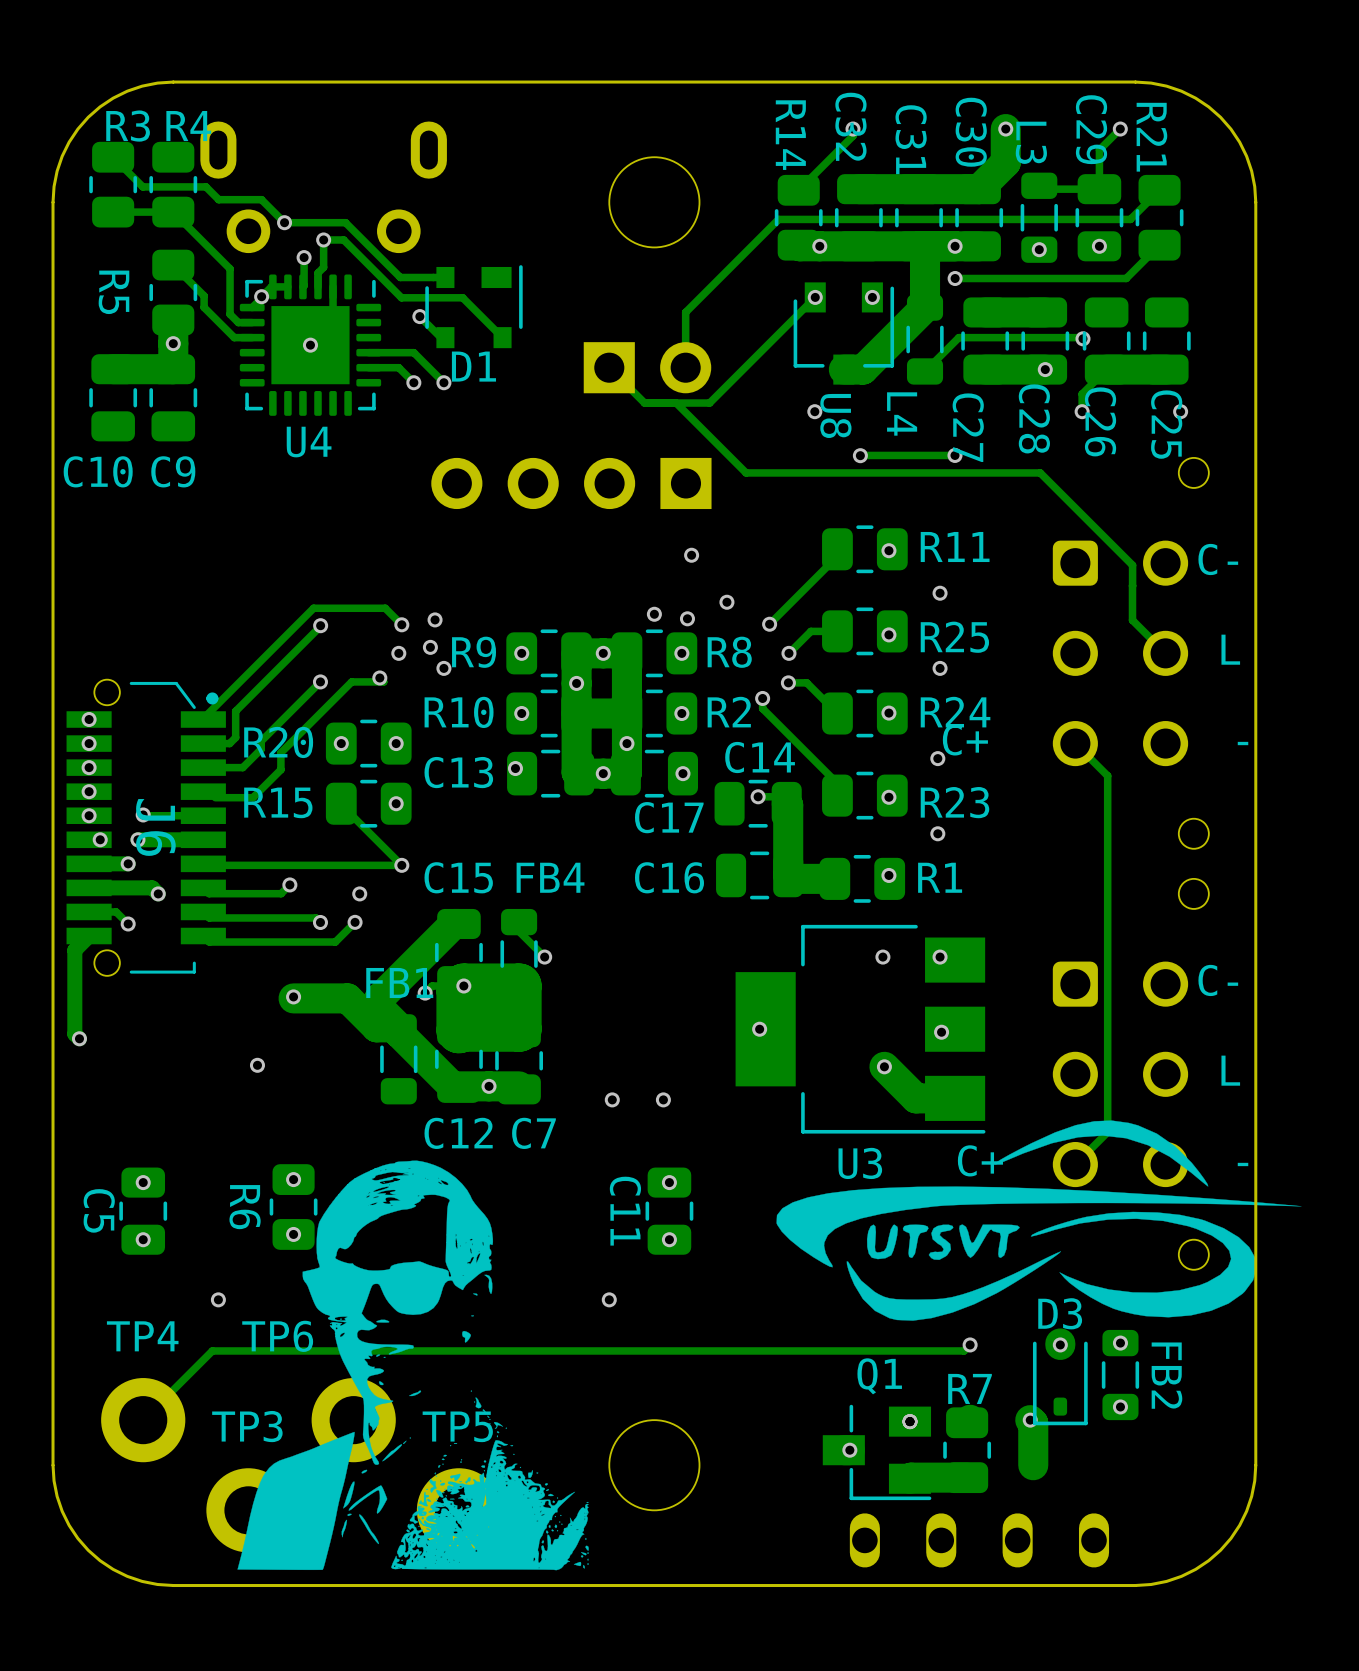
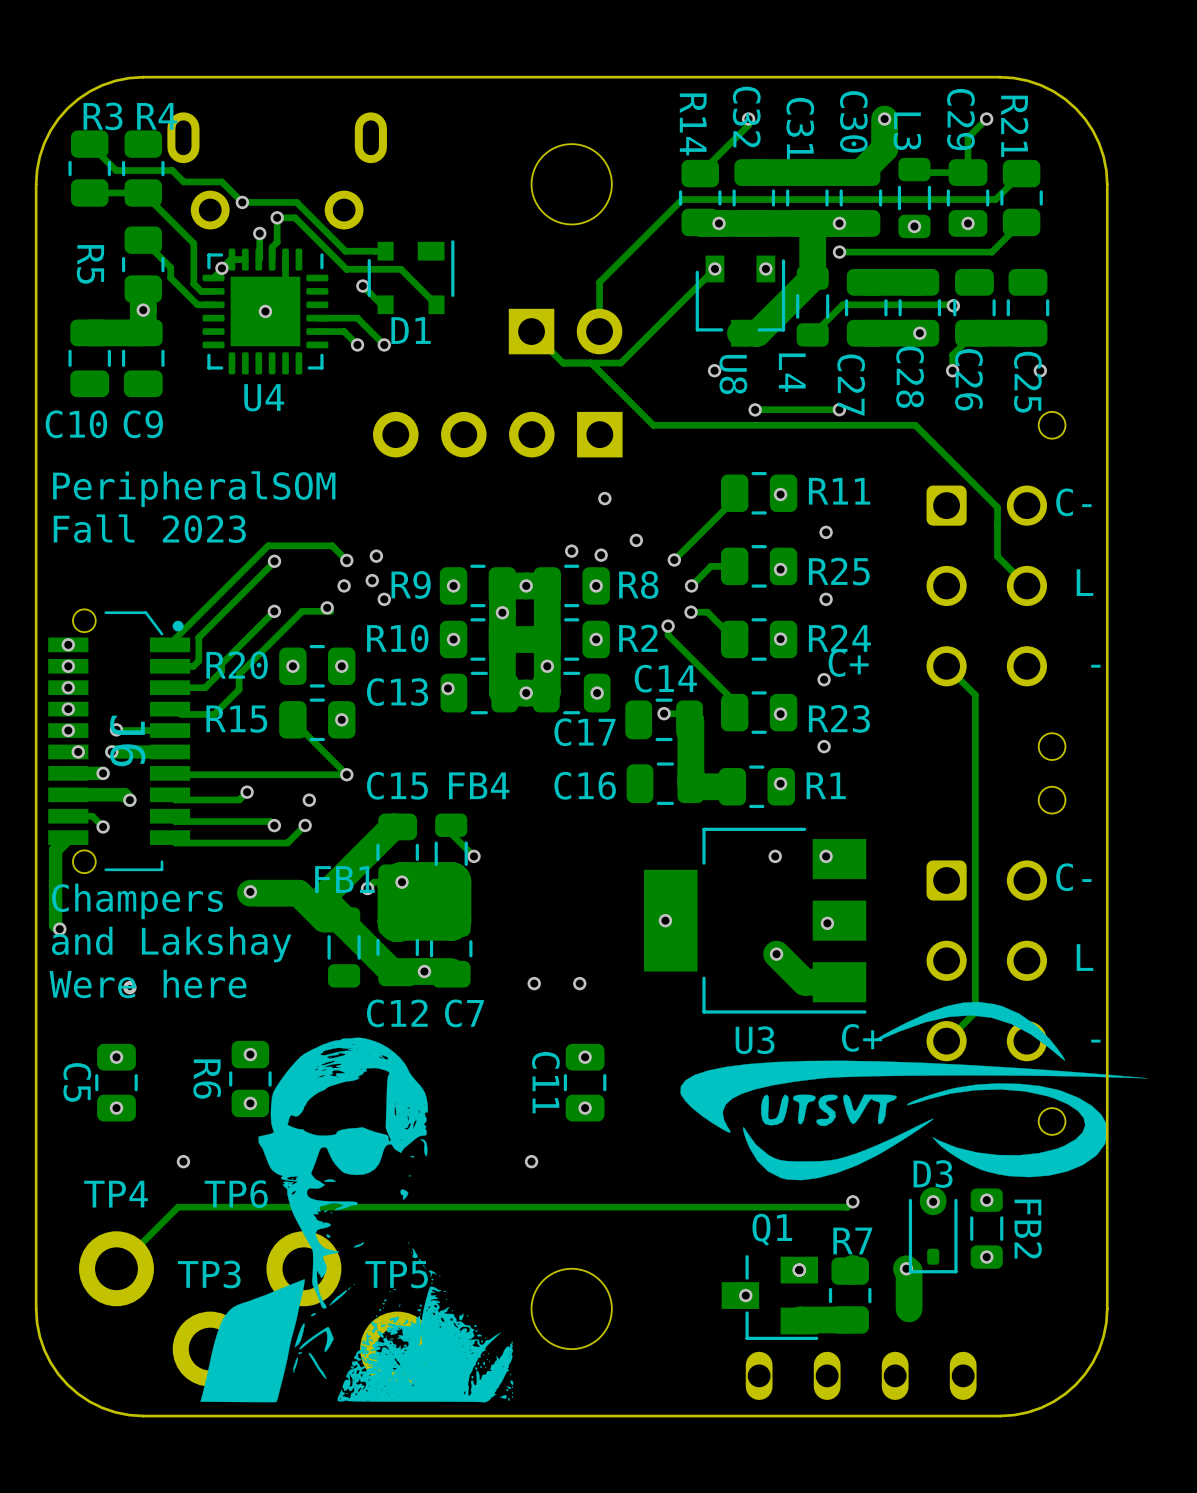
text: none -> PeripheralSOM (194, 489)
text: none -> Fall 2023 (149, 528)
text: none -> Champers (137, 901)
text: none -> and Lakshay (171, 944)
via: (257, 1065) -> none
text: none -> Were here (147, 984)
via: none -> (129, 987)

